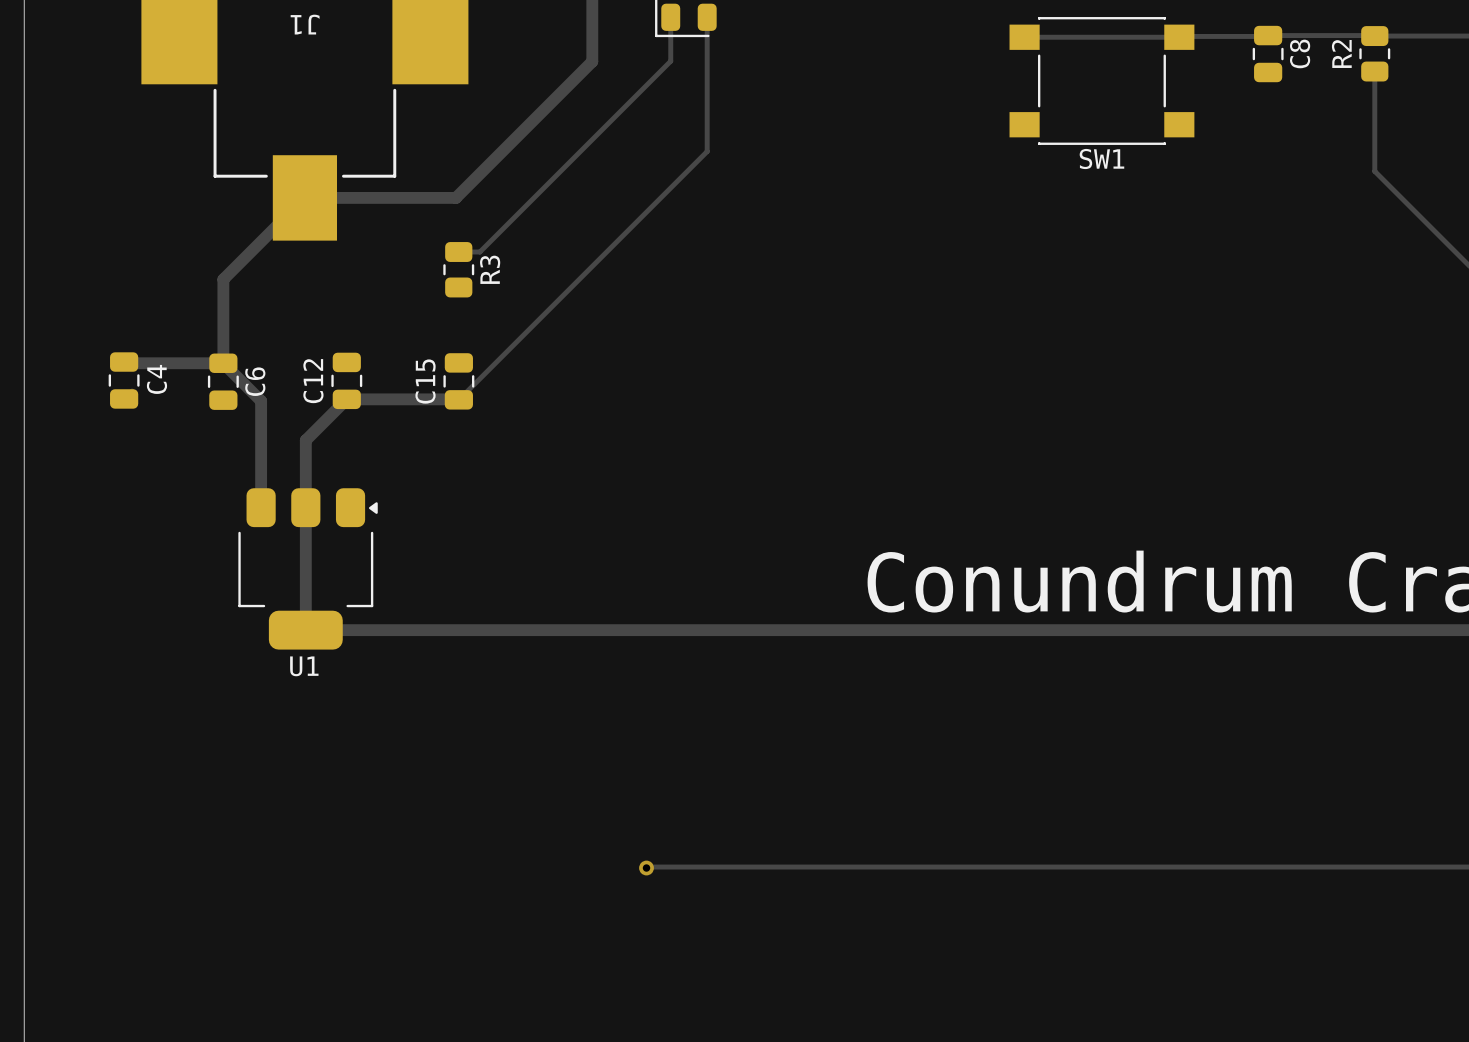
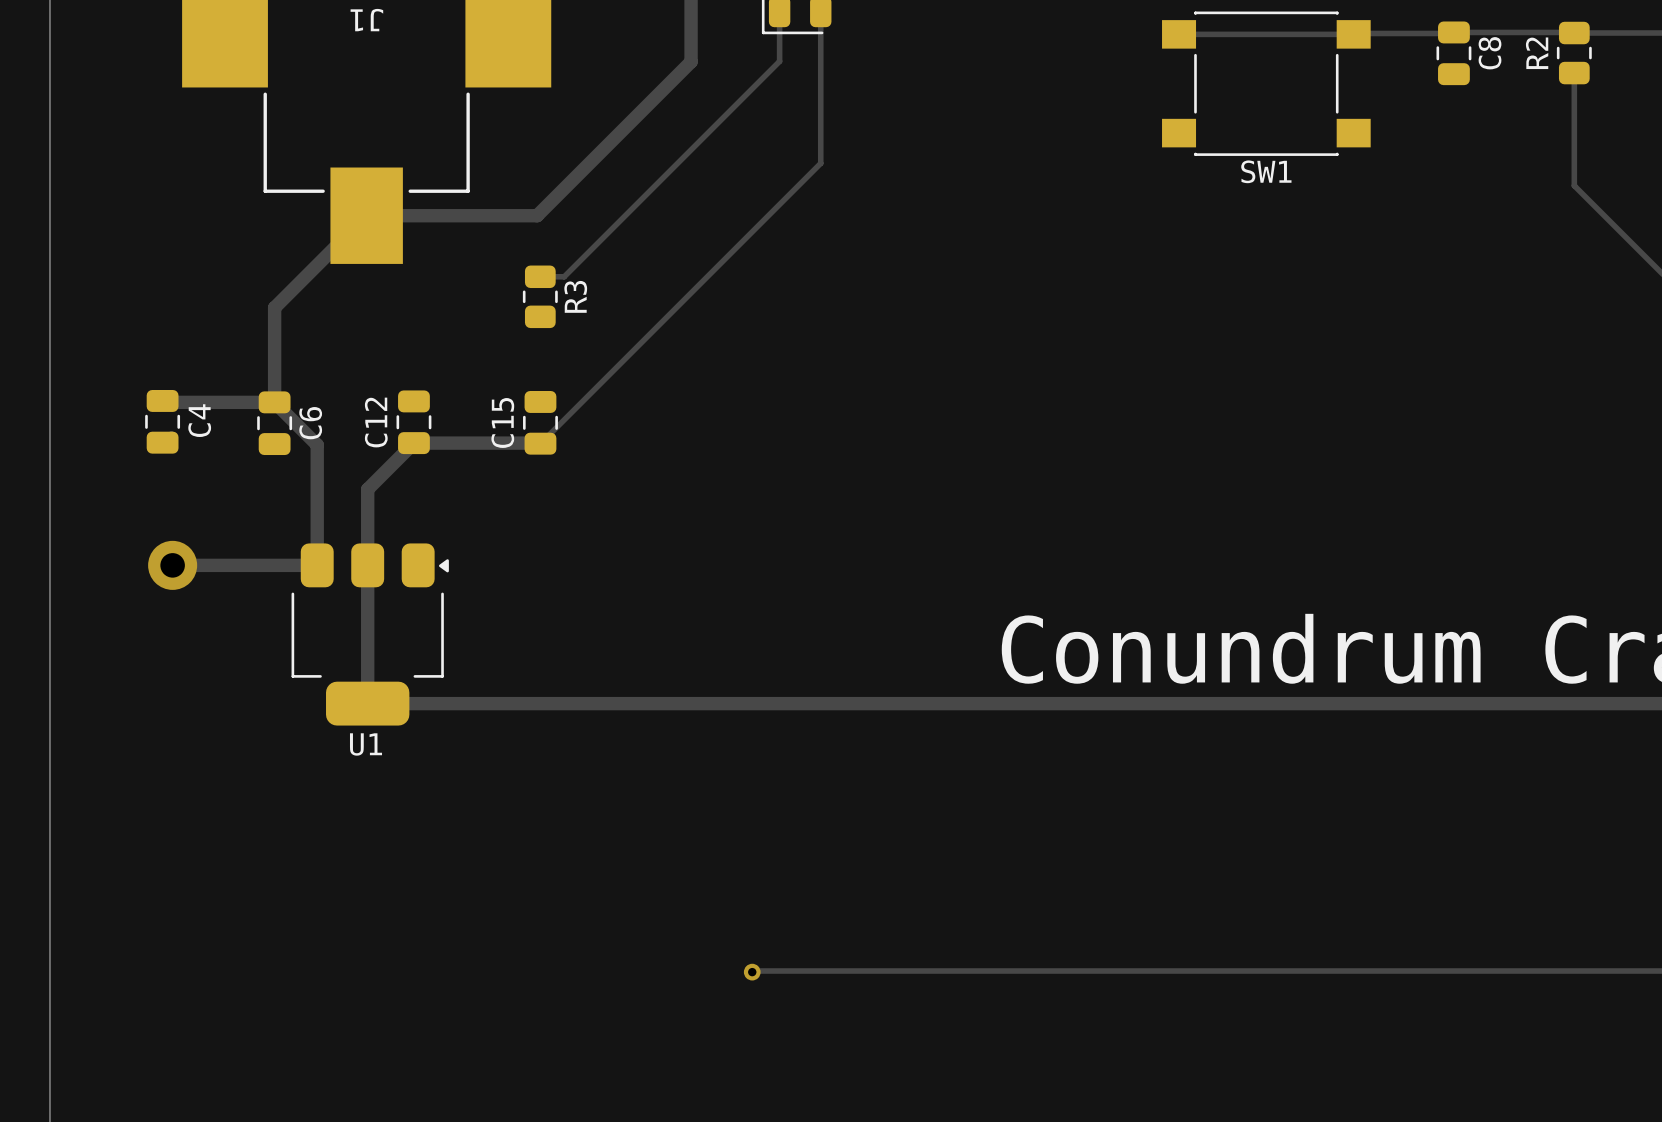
track: none -> (172, 565) (317, 565)
via: none -> (172, 565)

